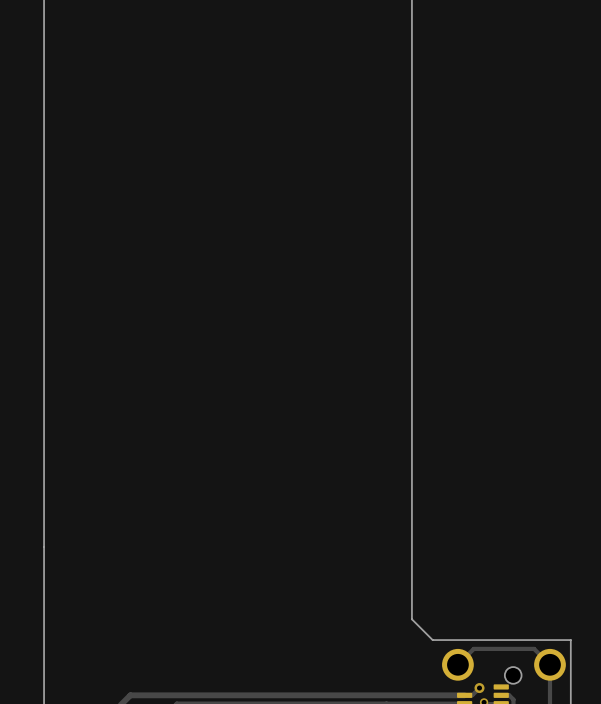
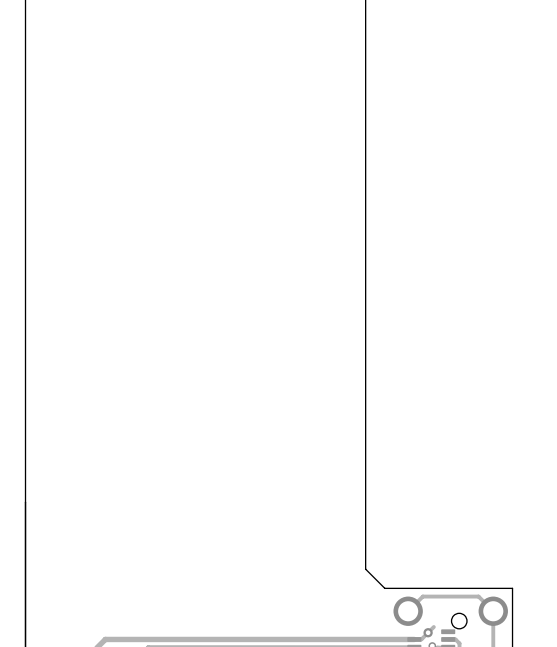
track: none -> (433, 627) (428, 632)

